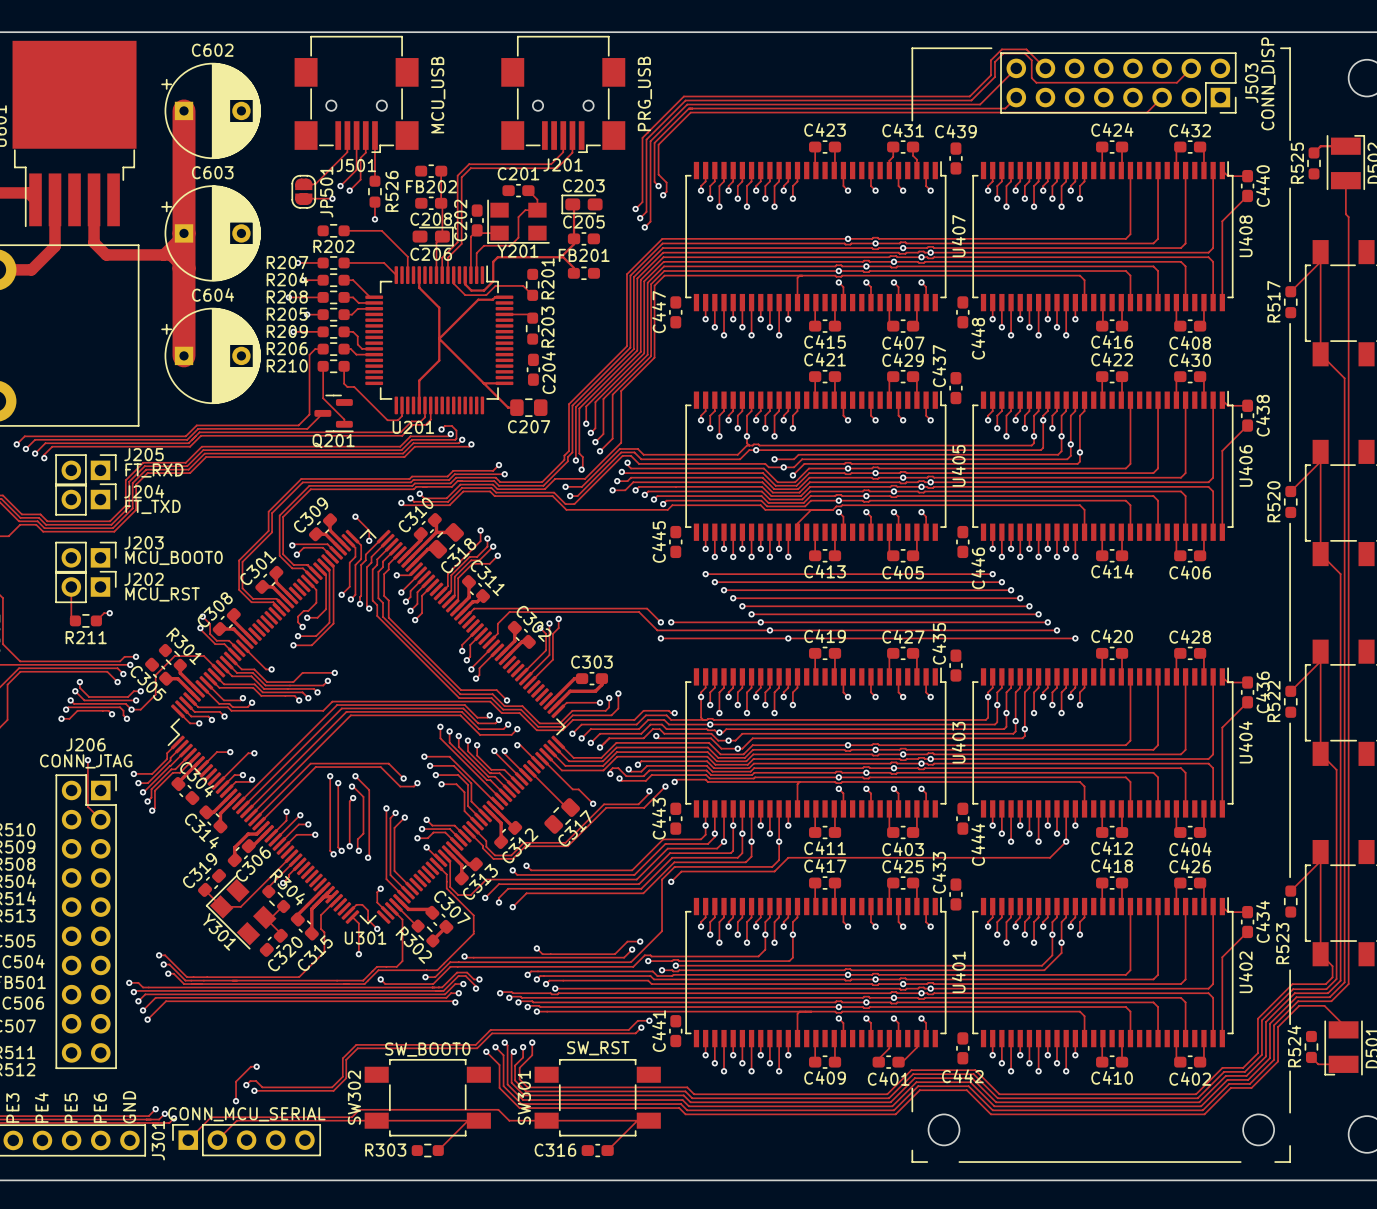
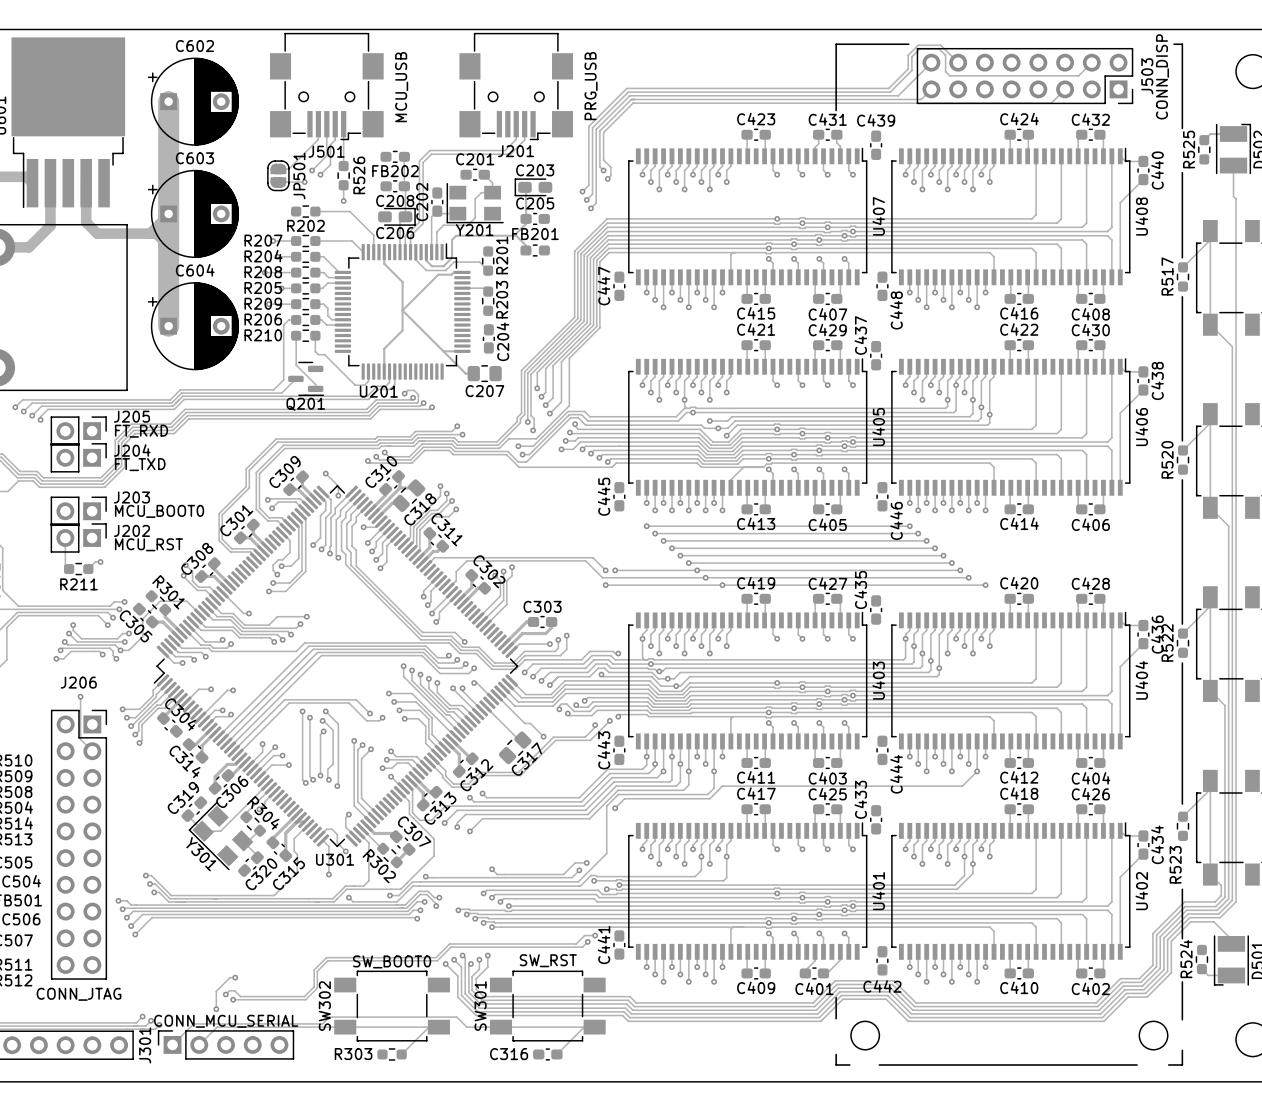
J206 value position: CONN_JTAG (86, 761) -> CONN_JTAG (79, 994)
text: PE4 (41, 1107) -> none
text: GND (129, 1107) -> none
text: PE3 (12, 1108) -> none
text: PE5 (71, 1108) -> none
text: PE6 (100, 1108) -> none

